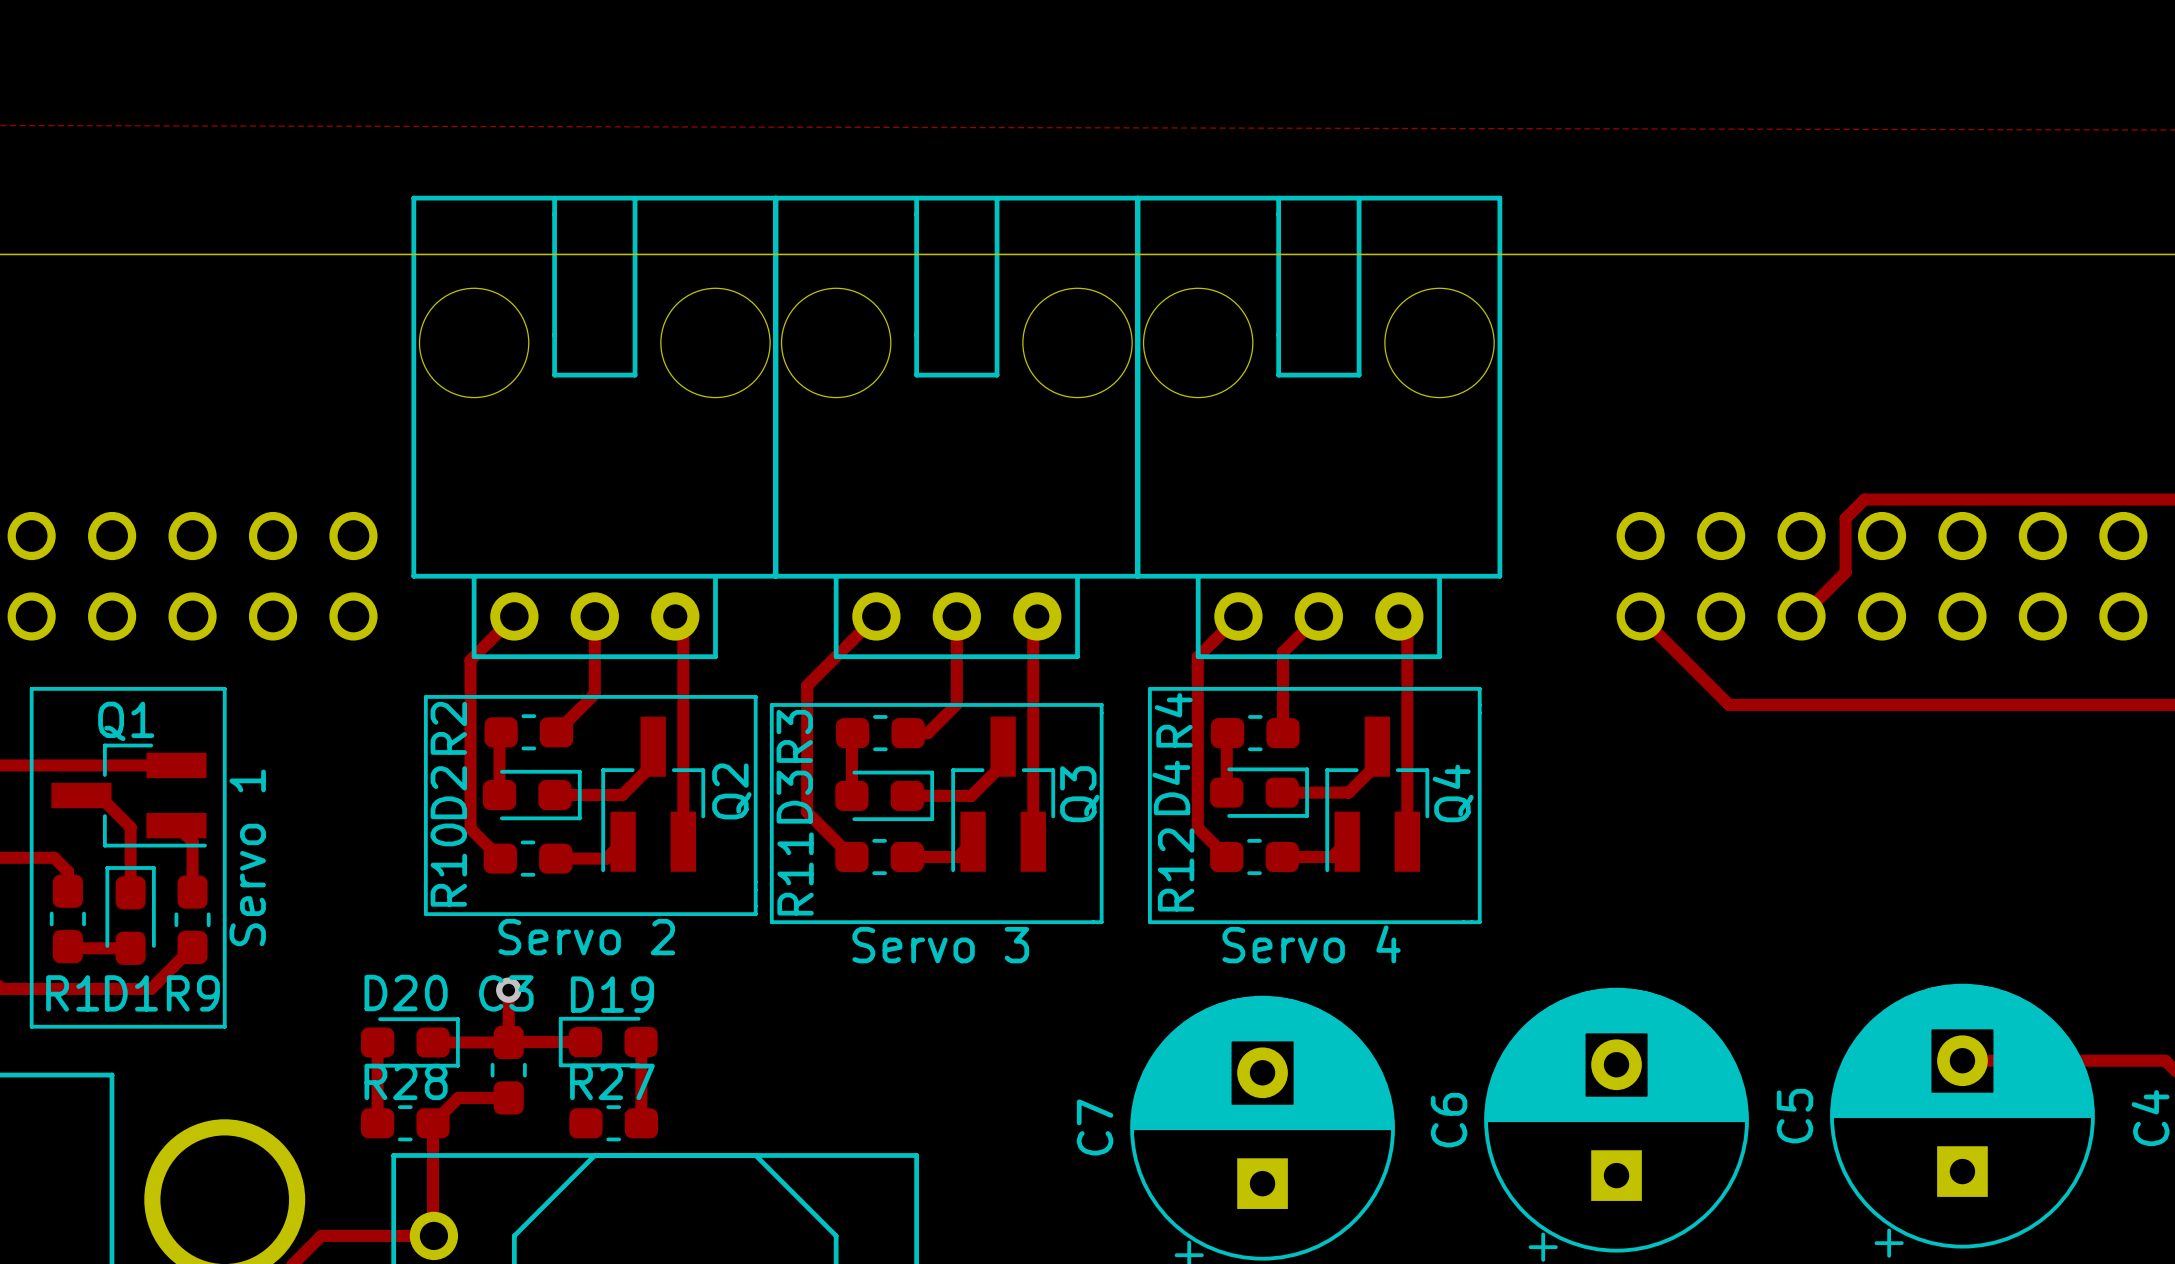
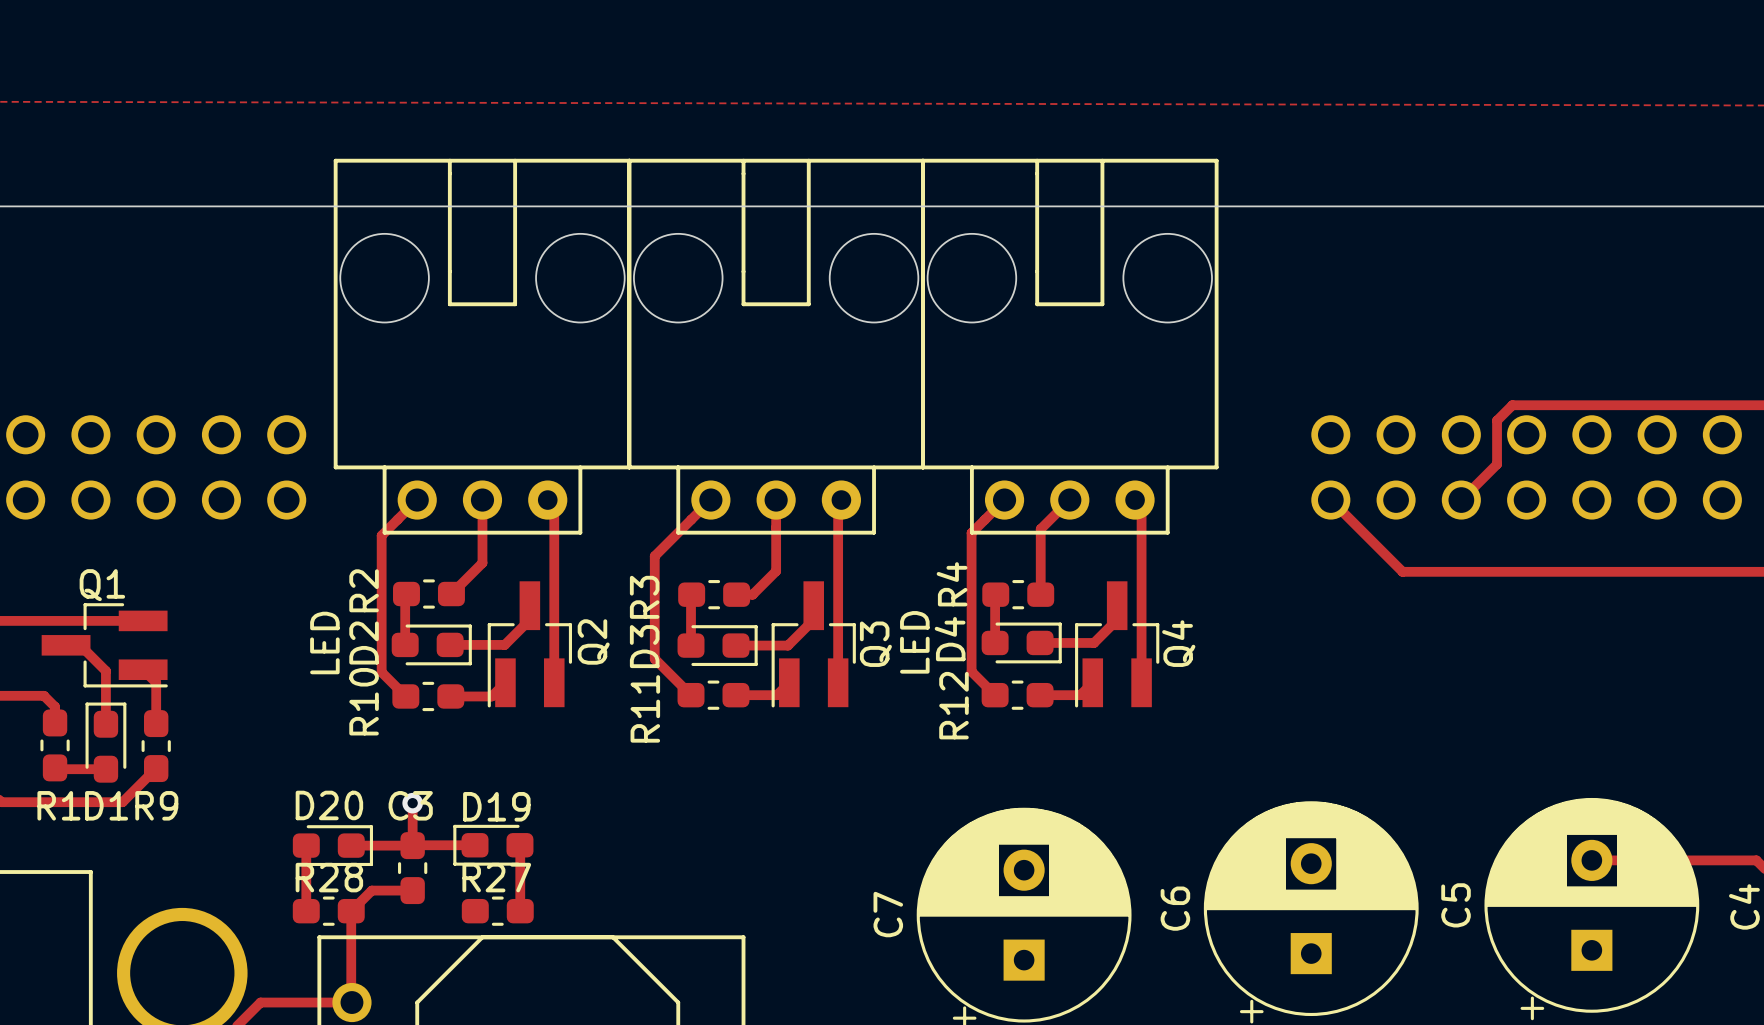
line: (31, 688) (224, 688) (224, 1026) (31, 1026) (31, 688) -> none
line: (1149, 688) (1479, 688) (1479, 922) (1149, 922) (1149, 688) -> none
line: (425, 696) (755, 696) (755, 914) (425, 914) (425, 696) -> none
line: (771, 704) (771, 922) (1101, 922) (1101, 704) (771, 704) -> none
D4 value: none -> LED (914, 642)
D2 value: none -> LED (324, 643)
text: Servo 1 (247, 857) -> none
text: Servo 2 (586, 937) -> none
text: Servo 4 (1311, 944) -> none
text: Servo 3 (940, 945) -> none

